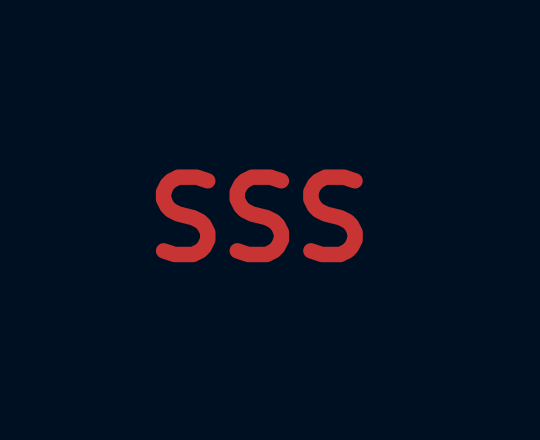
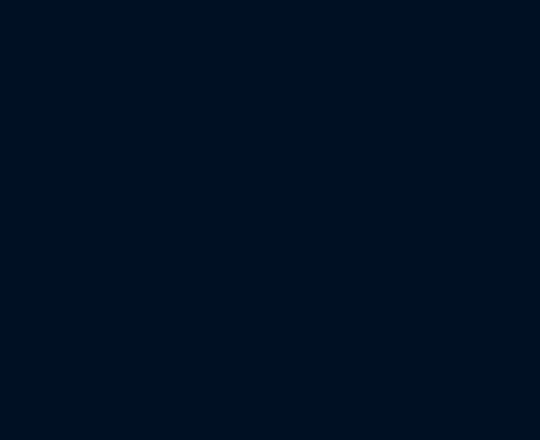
text: SSS (259, 215) -> none

